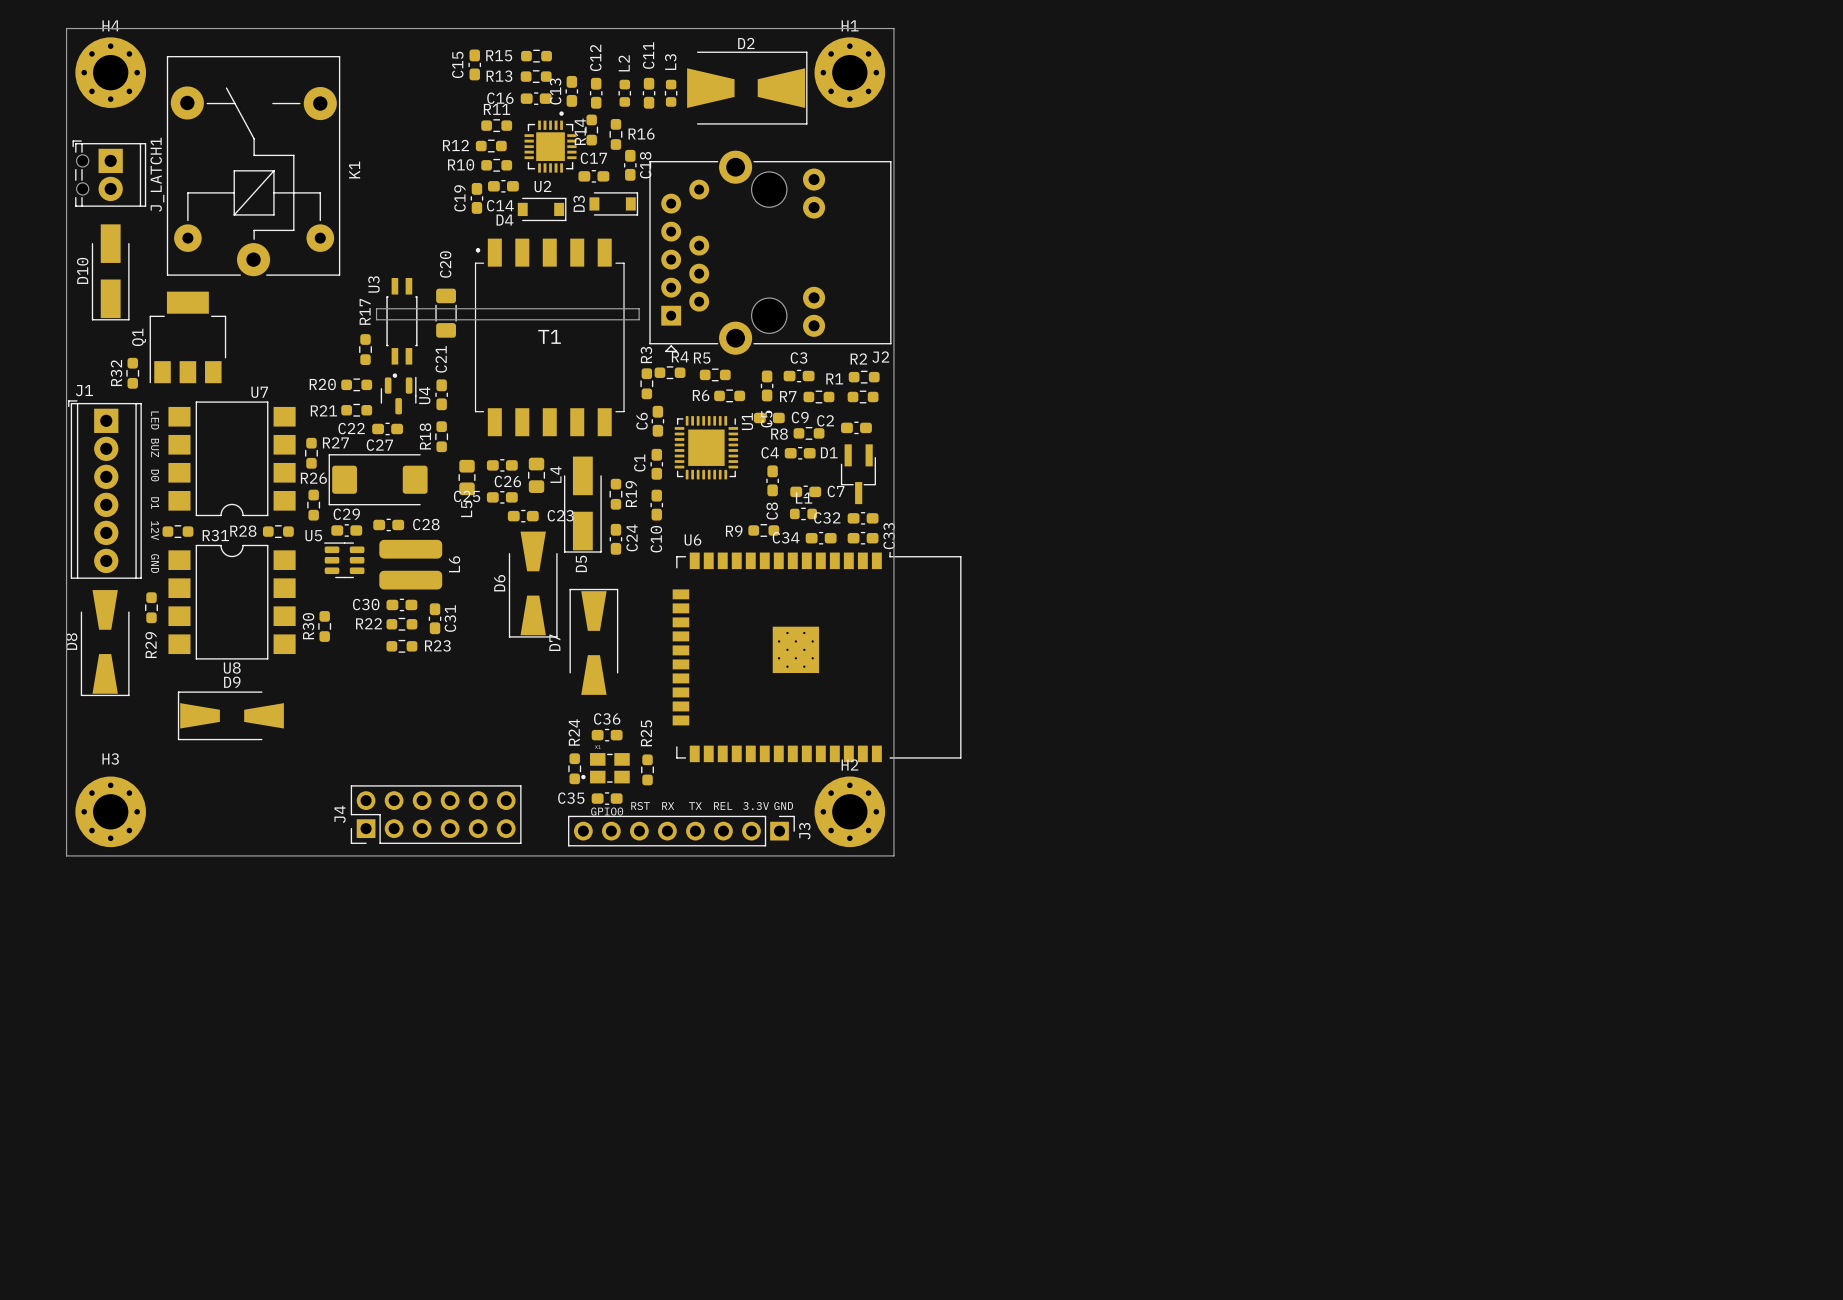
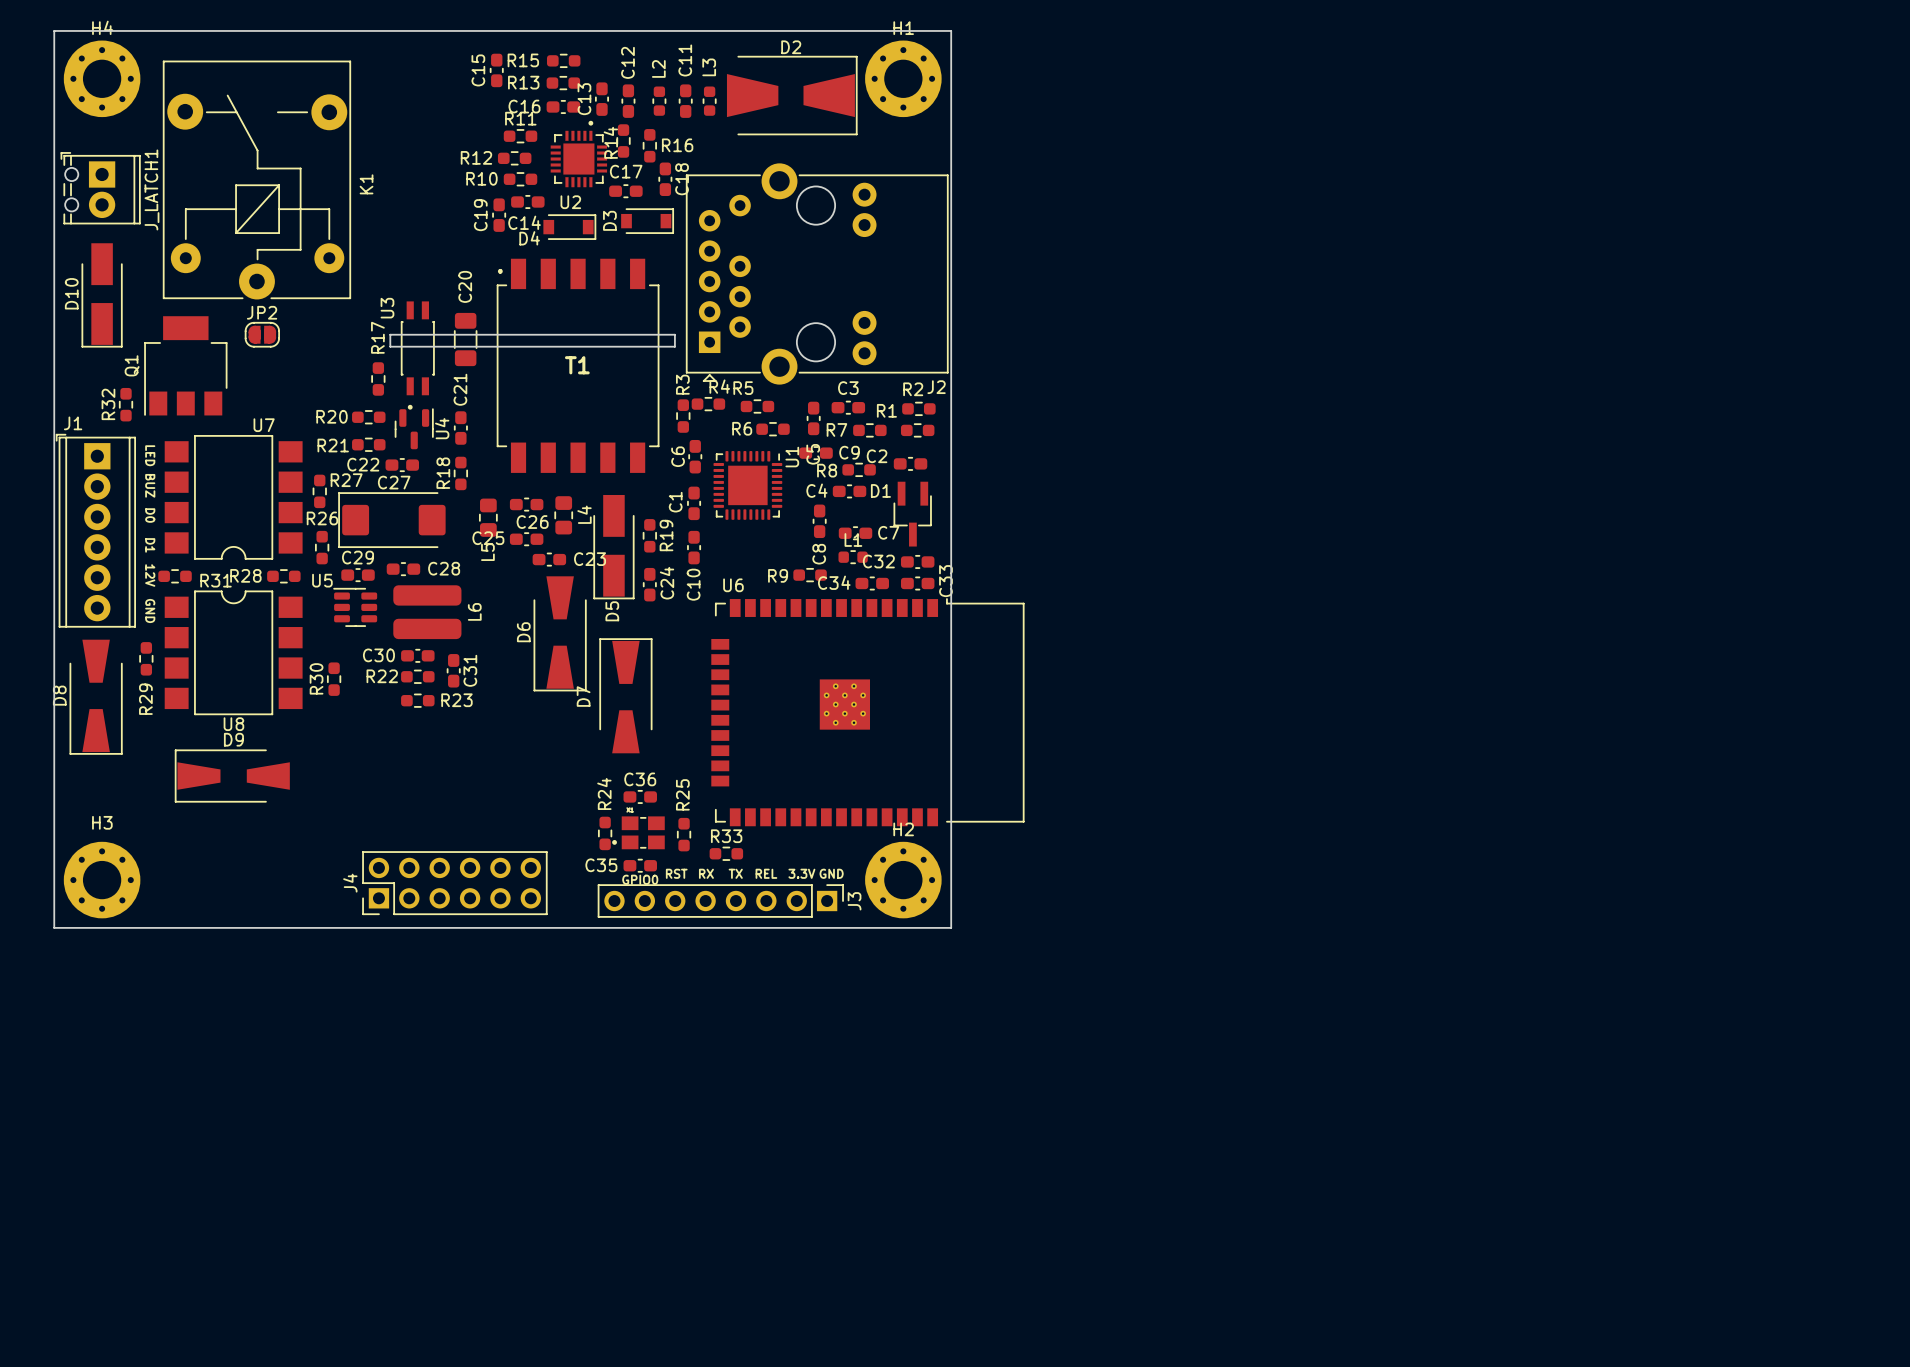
JP2: none -> (262, 334)
R33: none -> (726, 853)

